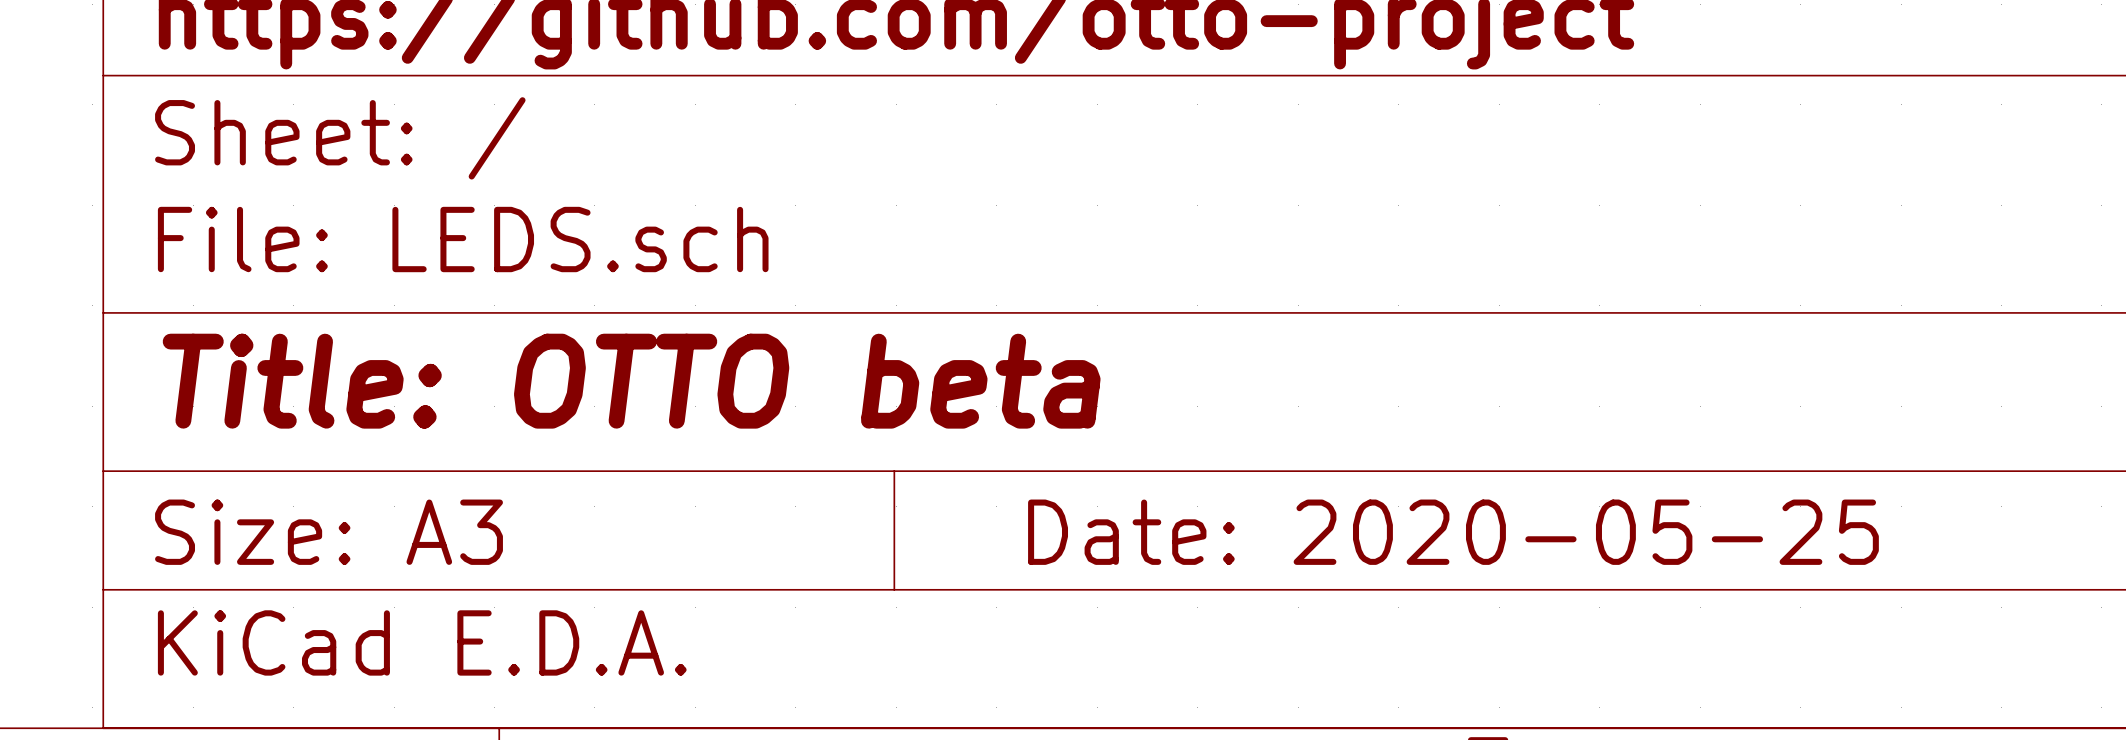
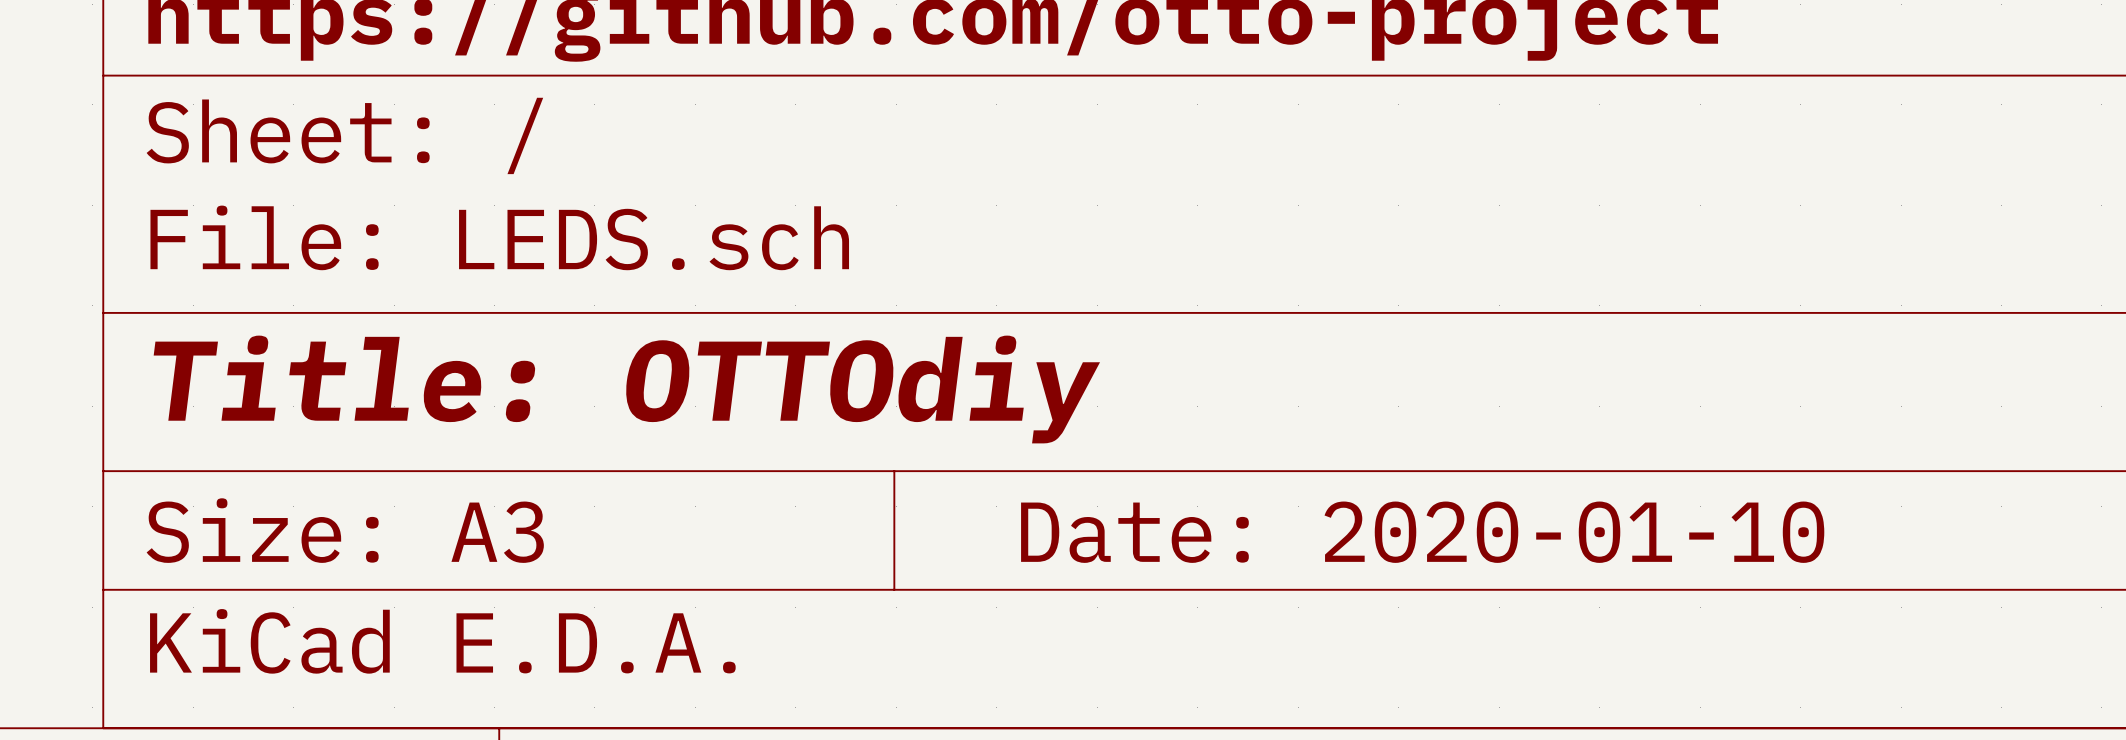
title block: Title: OTTO beta (631, 381) -> Title: OTTOdiy (626, 389)
title block: Date: 2020-05-25 (1453, 532) -> Date: 2020-01-10 (1422, 532)

